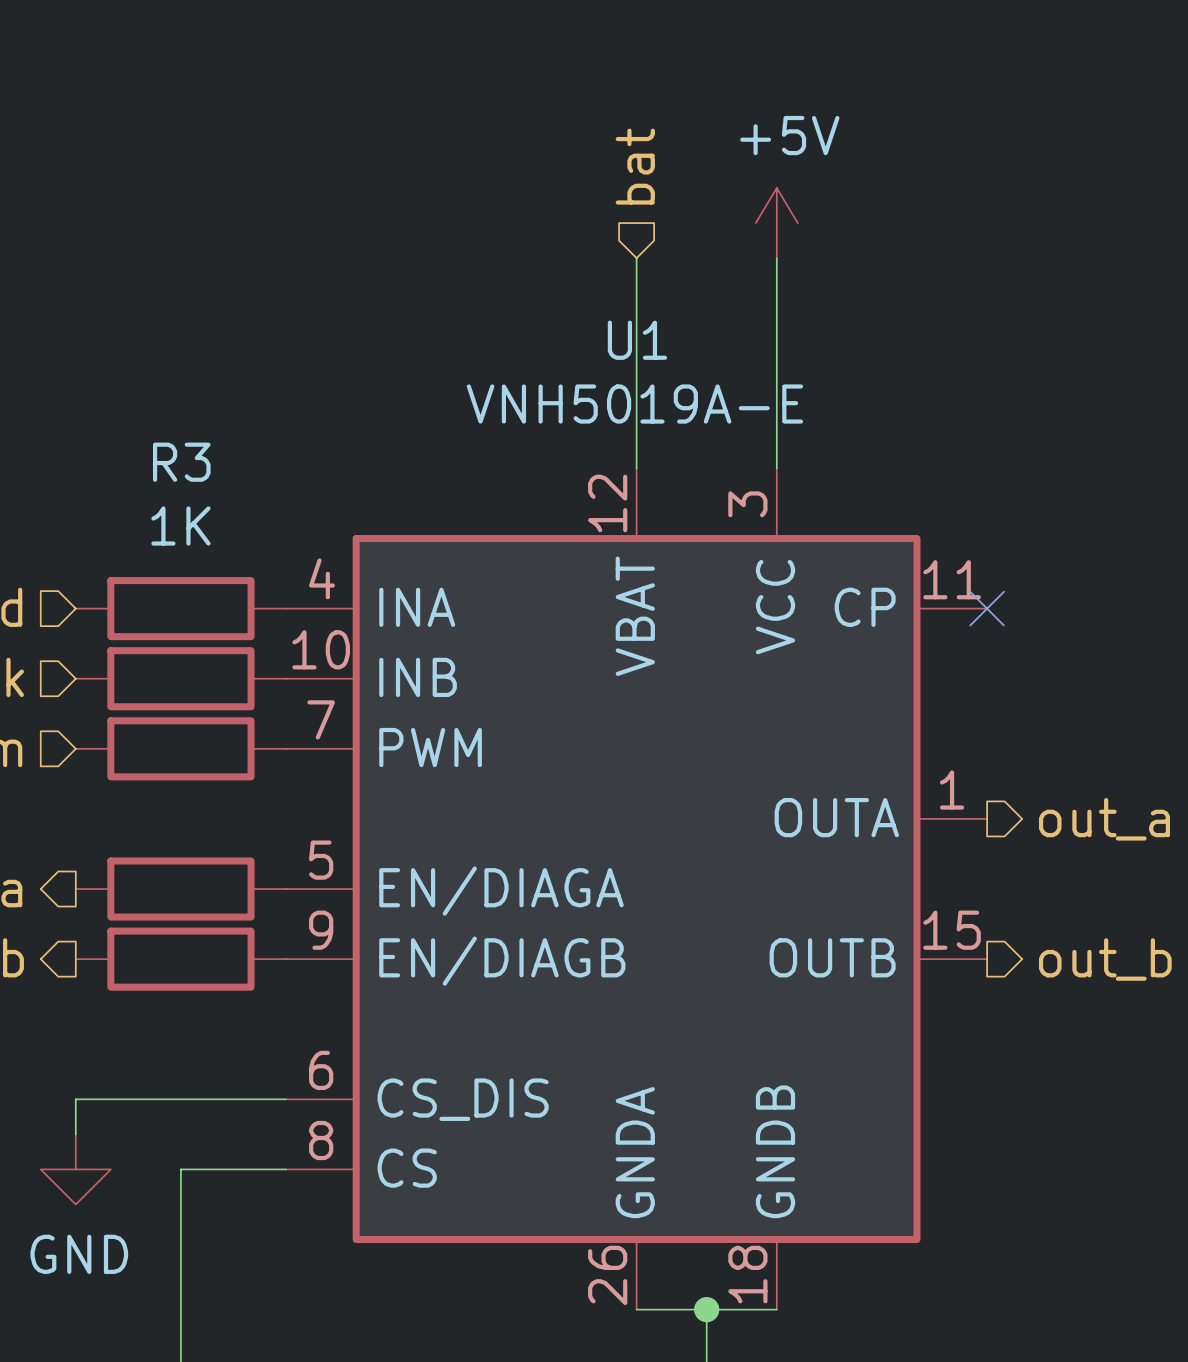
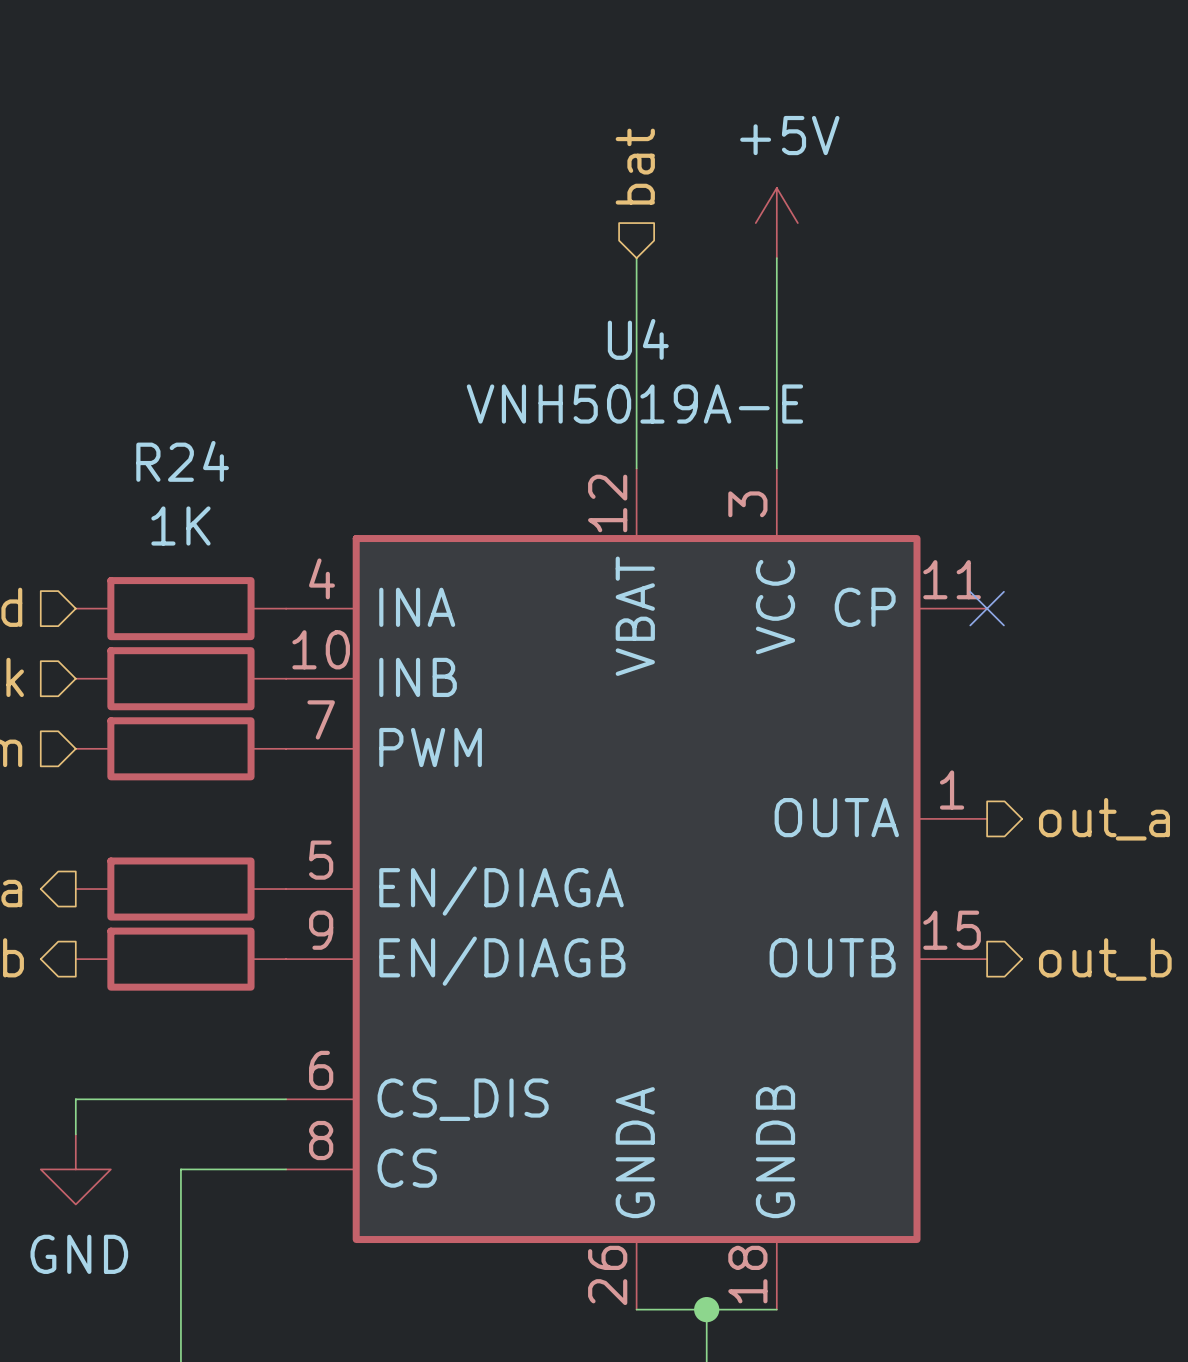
U1 name: U1 (637, 340) -> U4 (638, 339)
R3 name: R3 (181, 462) -> R24 (182, 461)

